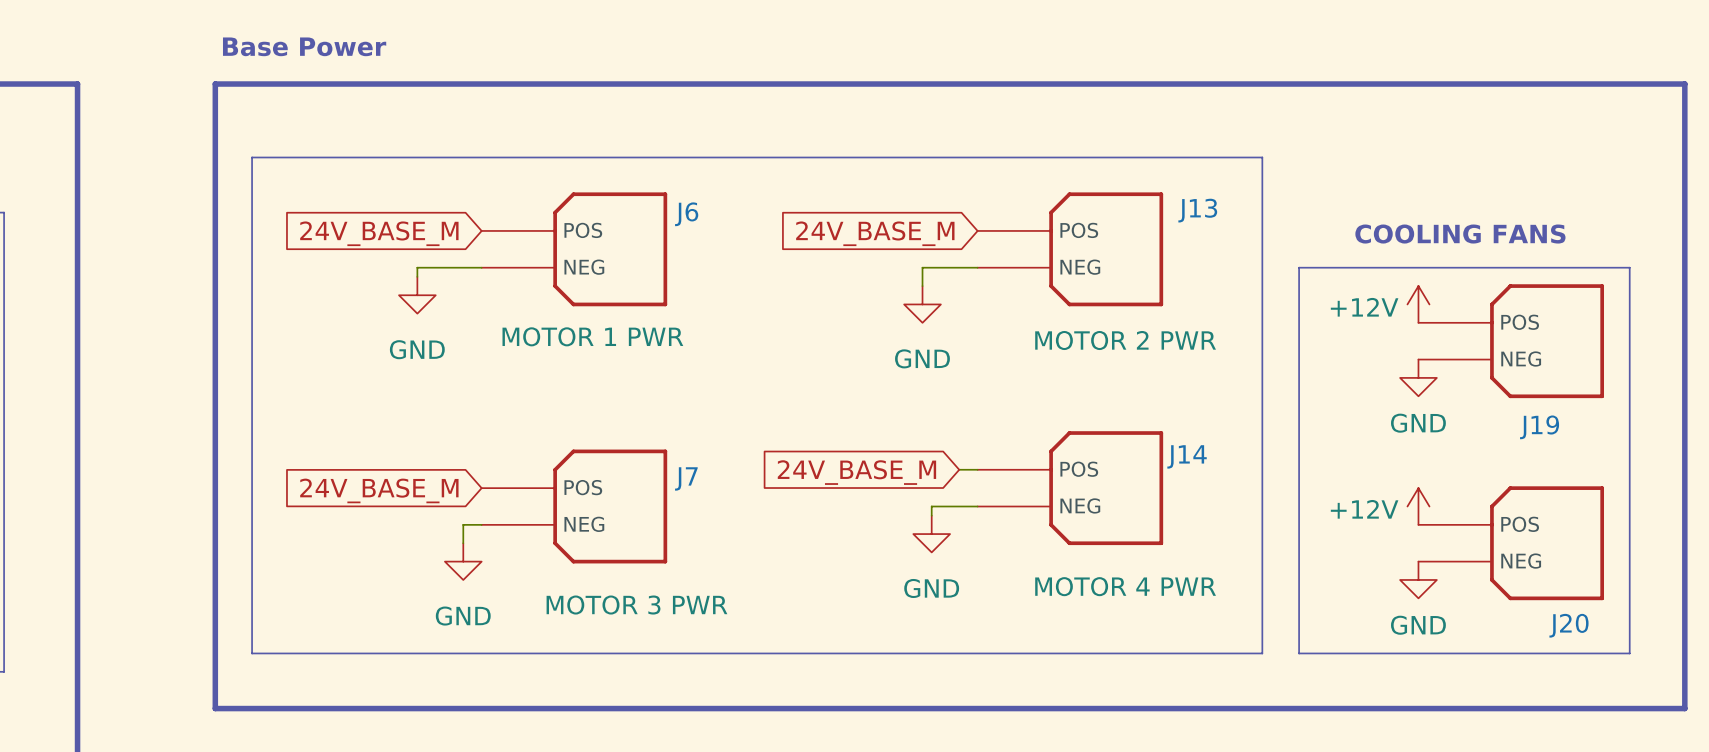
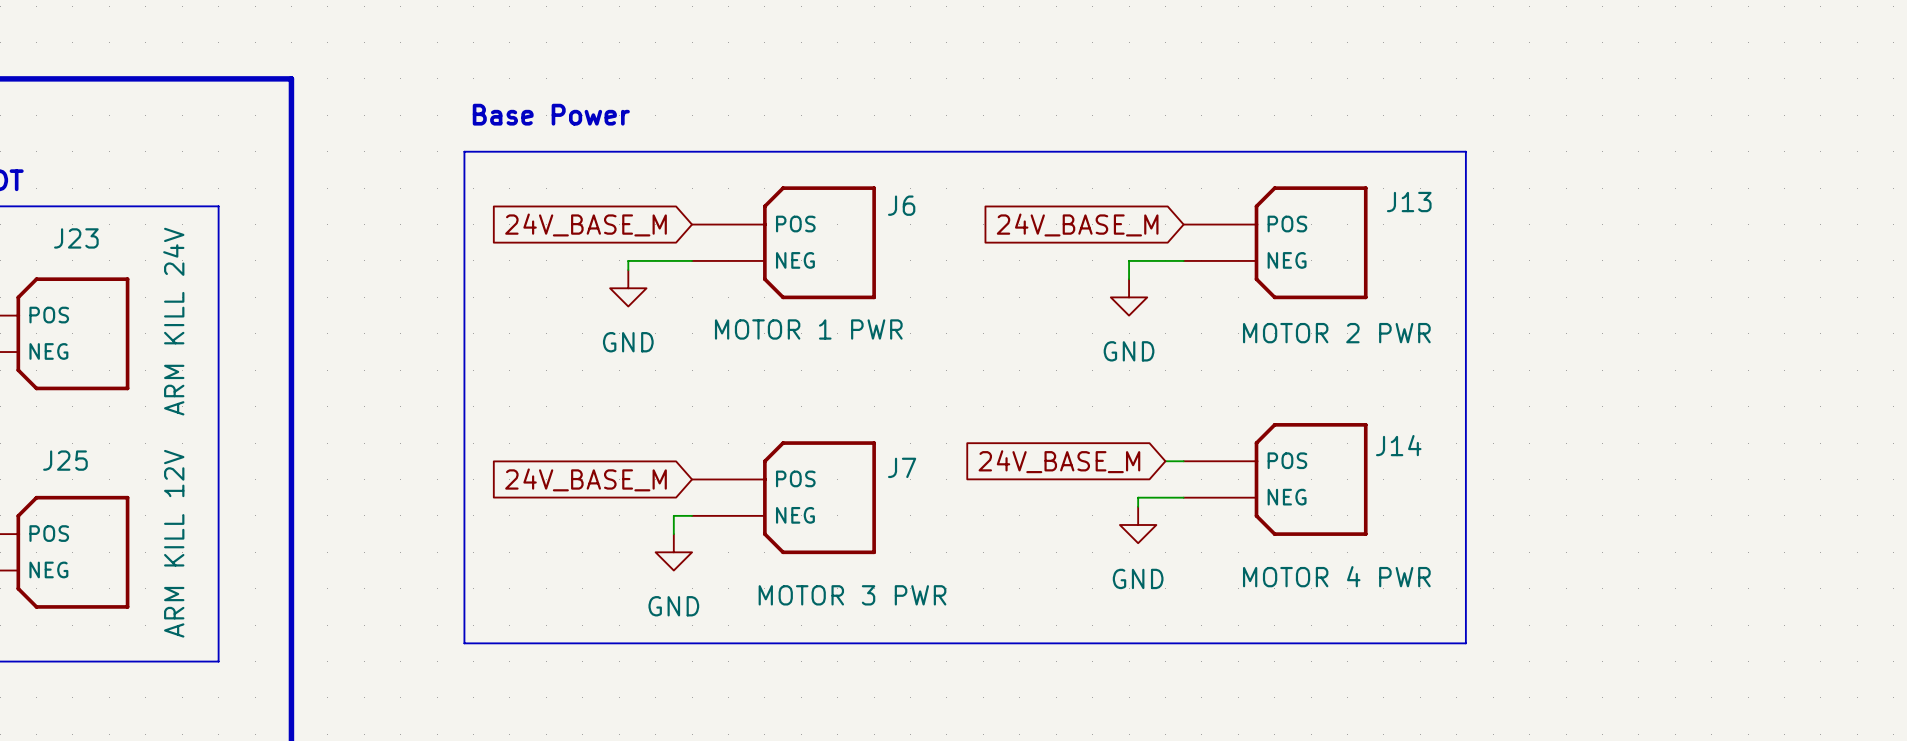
text position: Base Power (304, 46) -> Base Power (551, 114)
line: (215, 84) (1684, 84) (1684, 708) (215, 708) (215, 84) -> none
text: COOLING FANS (1460, 234) -> none
line: (1299, 267) (1629, 267) (1629, 653) (1299, 653) (1299, 267) -> none
power symbol: +12V (1418, 304) -> none
J19: (1511, 341) -> none
power symbol: GND (1418, 377) -> none
power symbol: +12V (1418, 506) -> none
J20: (1511, 543) -> none
power symbol: GND (1418, 579) -> none

